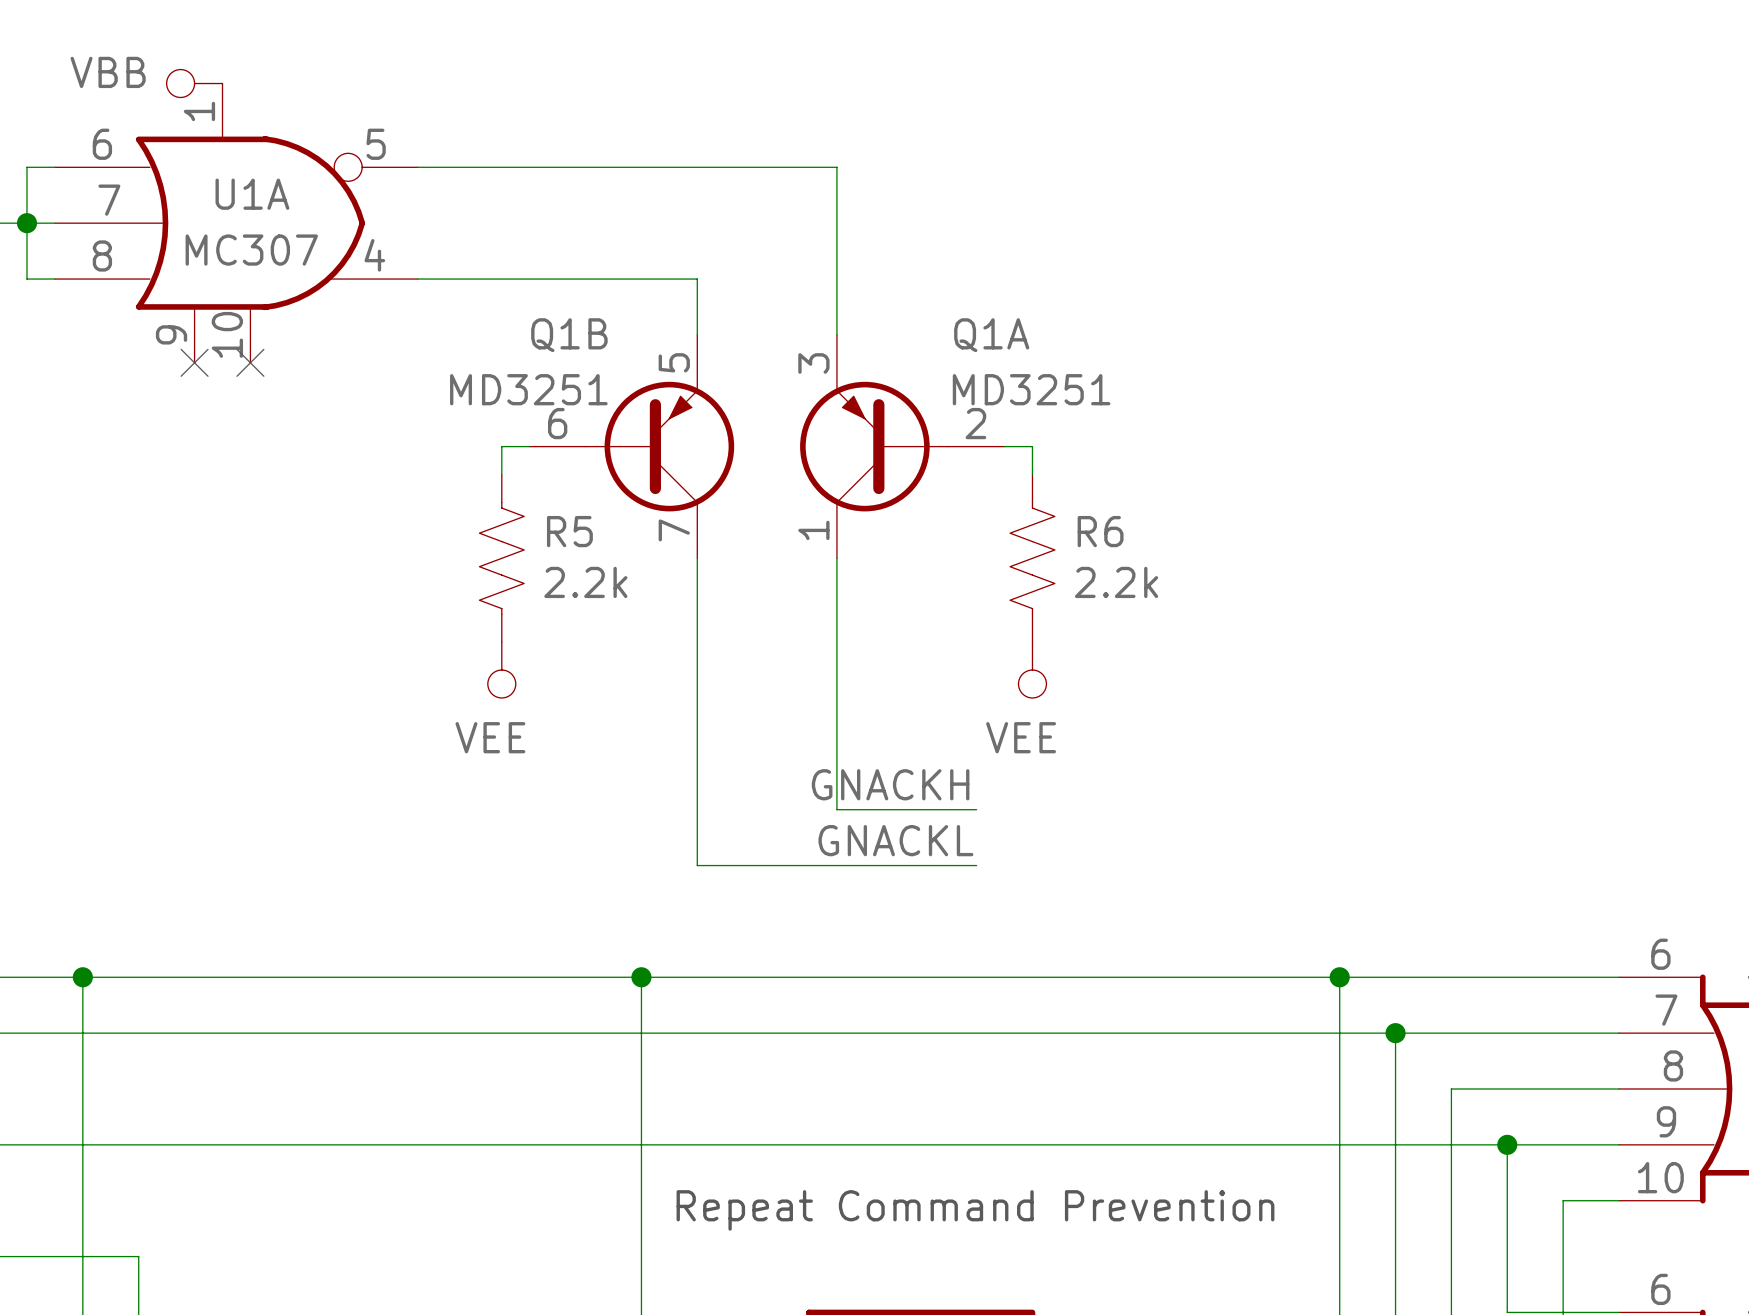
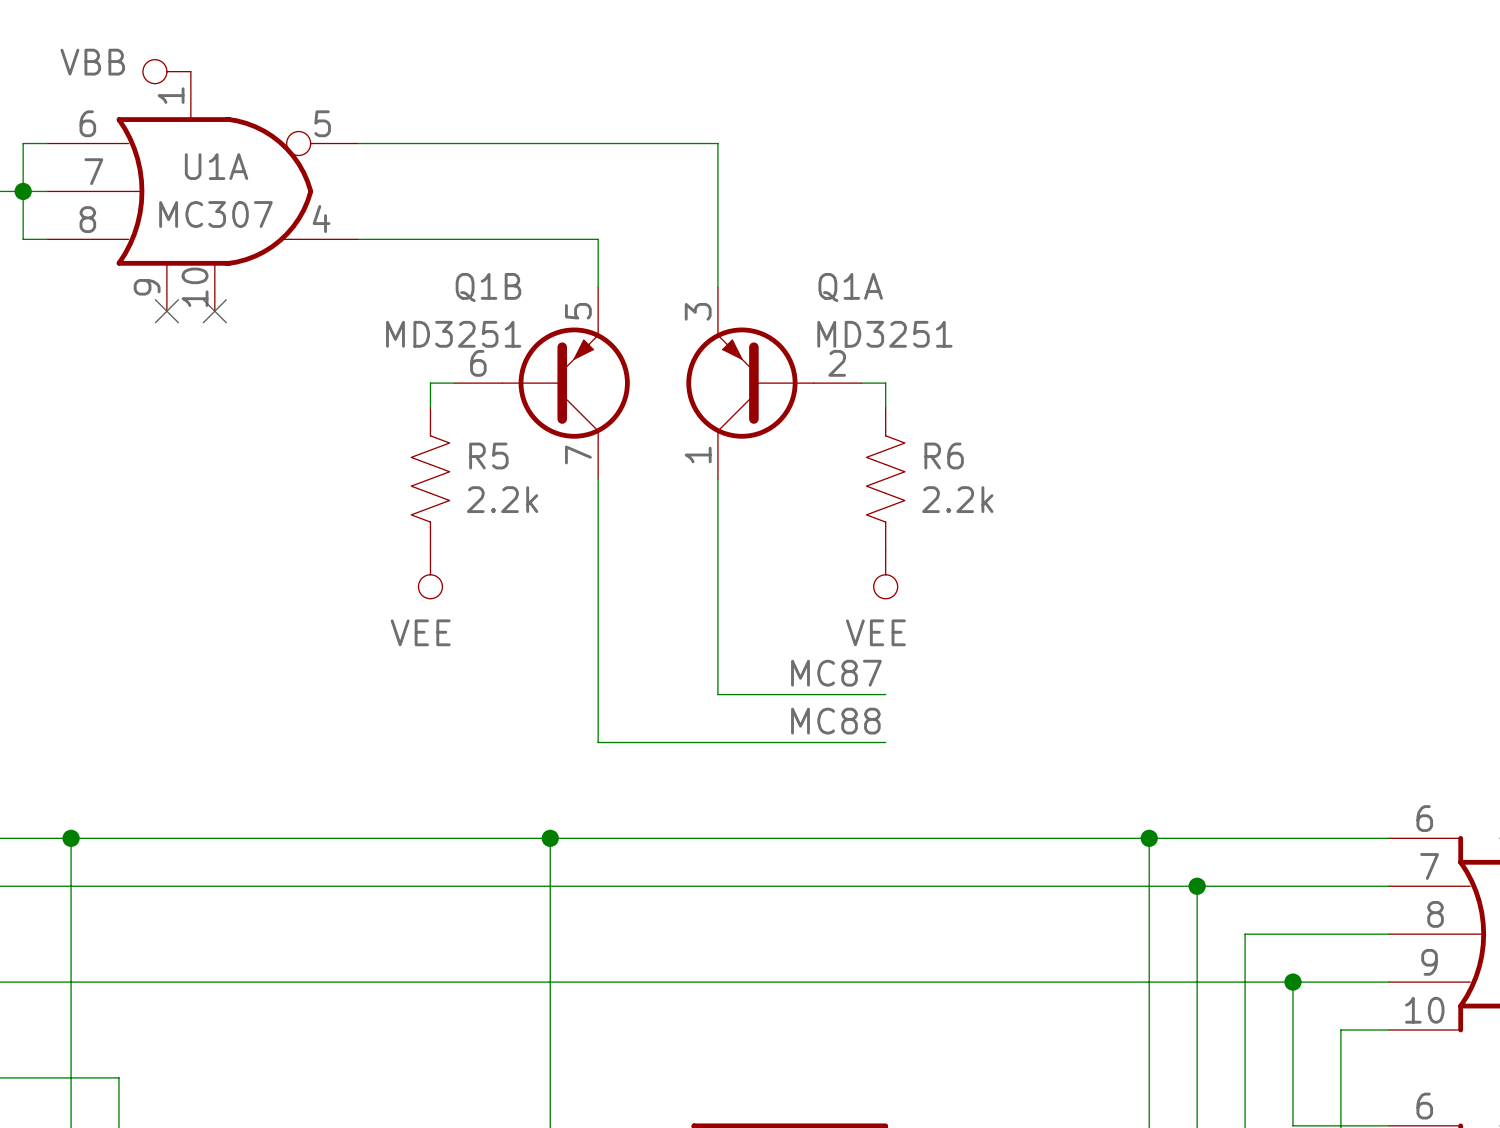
label: GNACKH (890, 784) -> none
label: none -> MC87 (836, 673)
wire: none -> (837, 694) (885, 694)
label: GNACKL (895, 840) -> none
label: none -> MC88 (835, 721)
wire: none -> (837, 742) (885, 742)
text: Repeat Command Prevention (975, 1210) -> none

